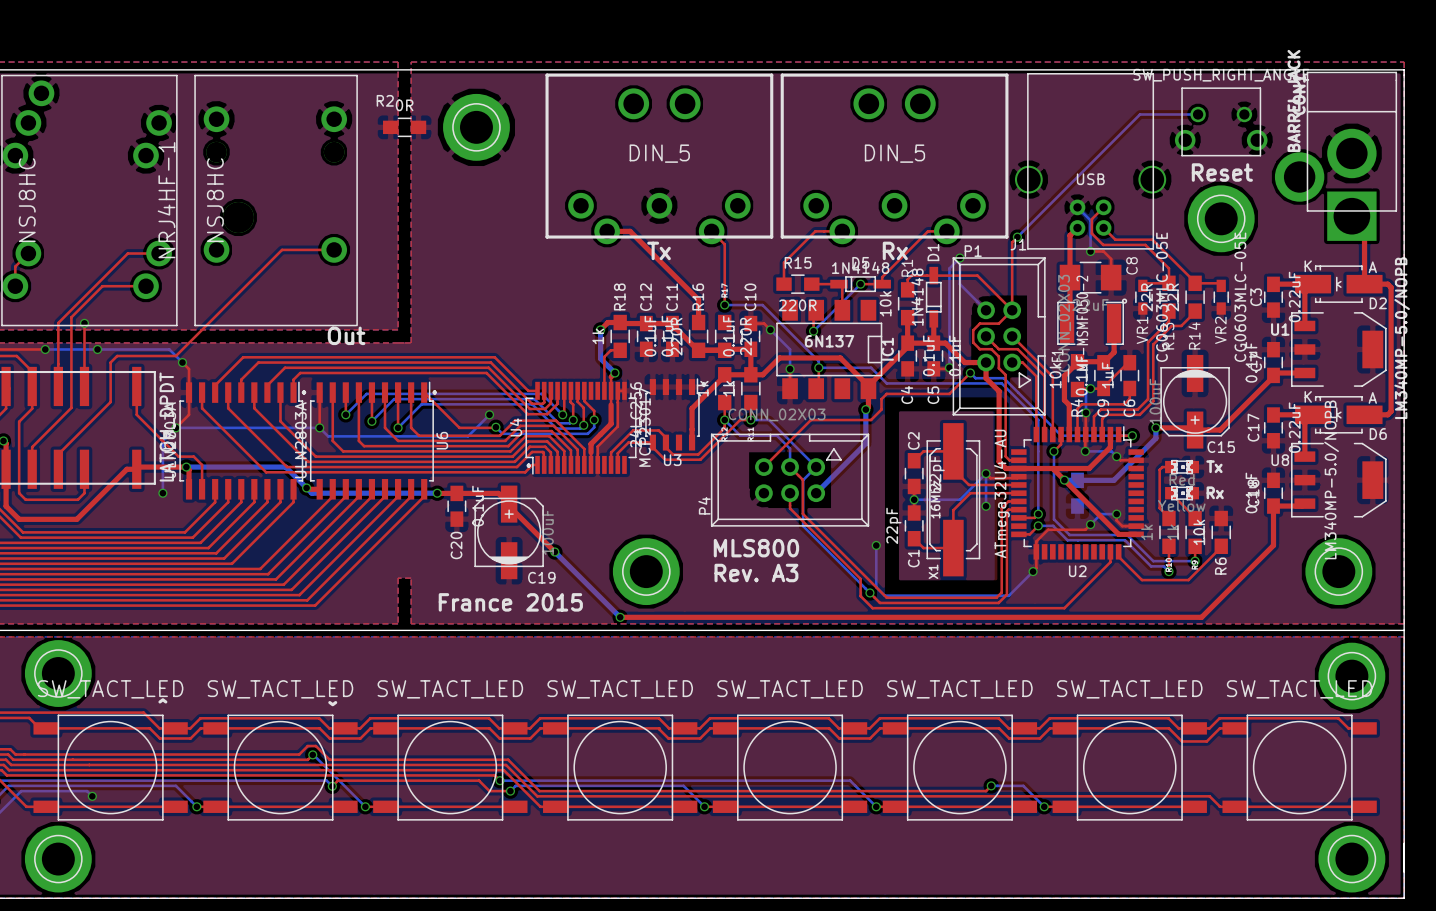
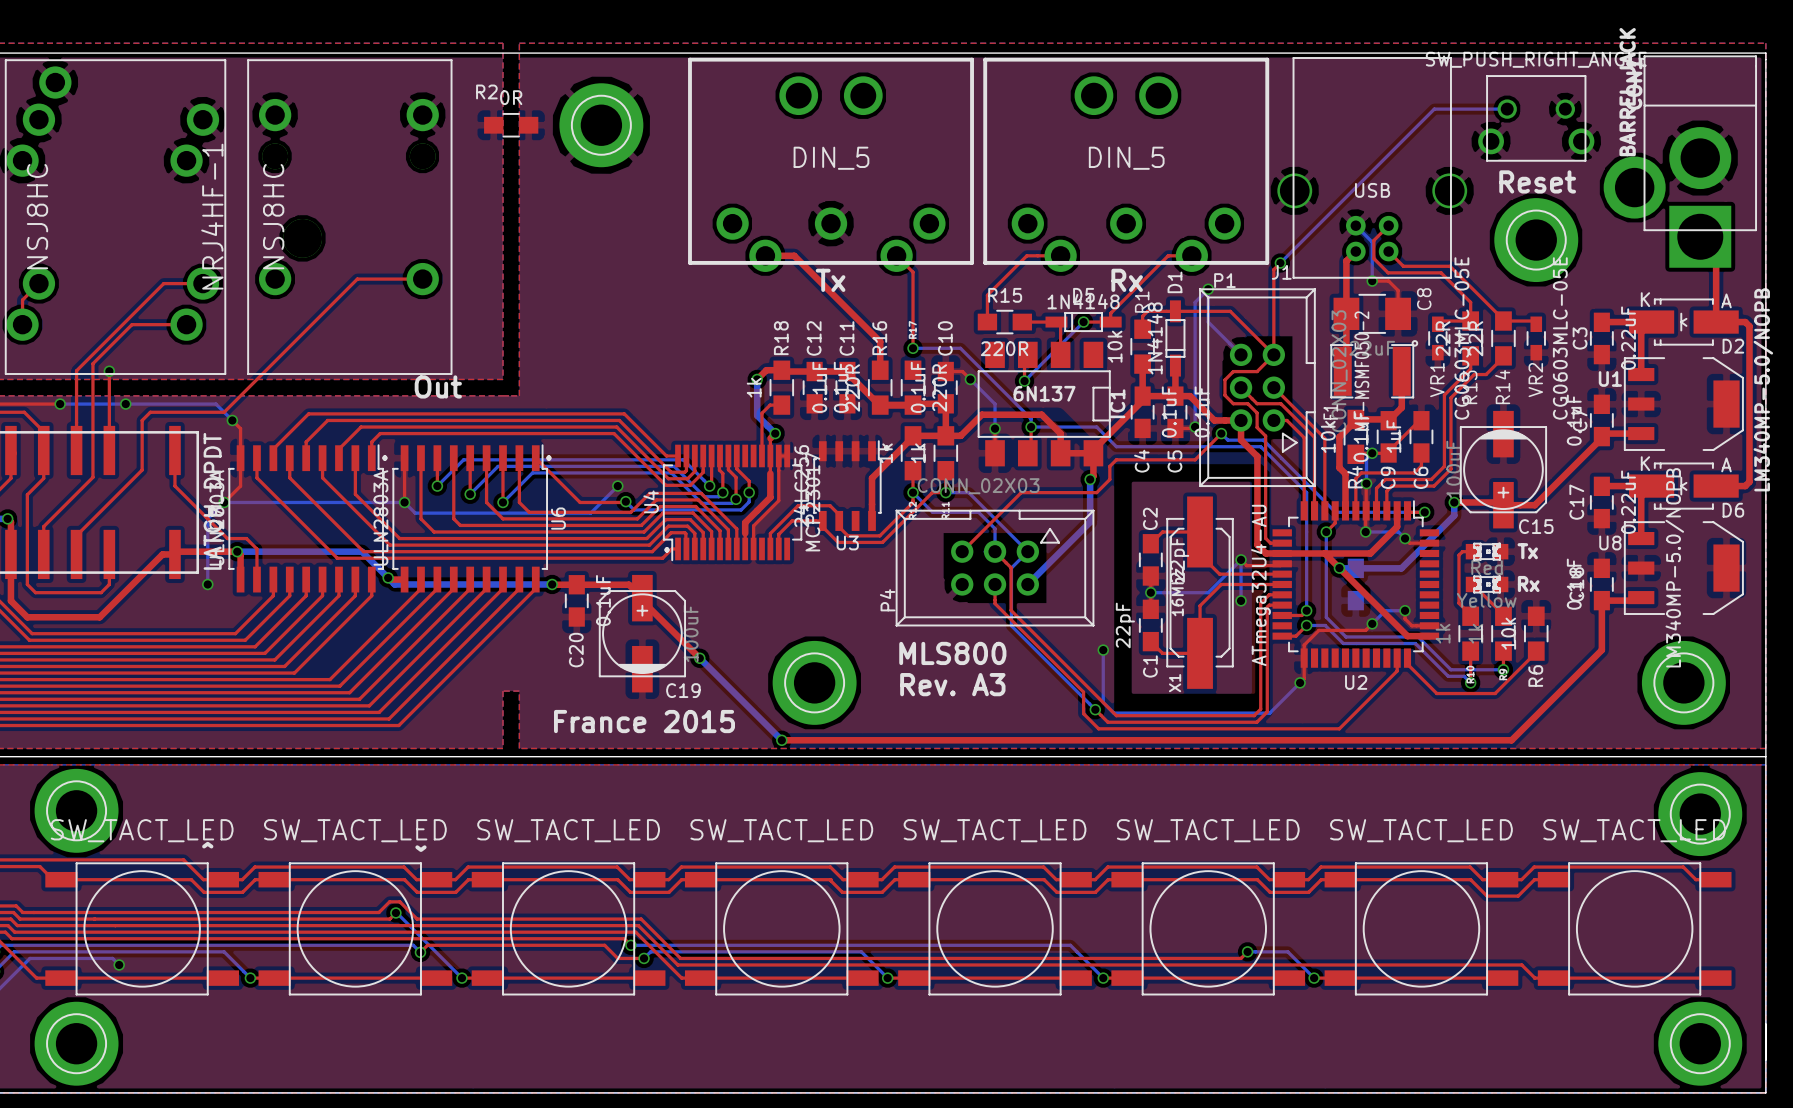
top track: (827, 357) (840, 357) (868, 386) -> (1041, 414) (1060, 433) (1060, 453) (1093, 453)

